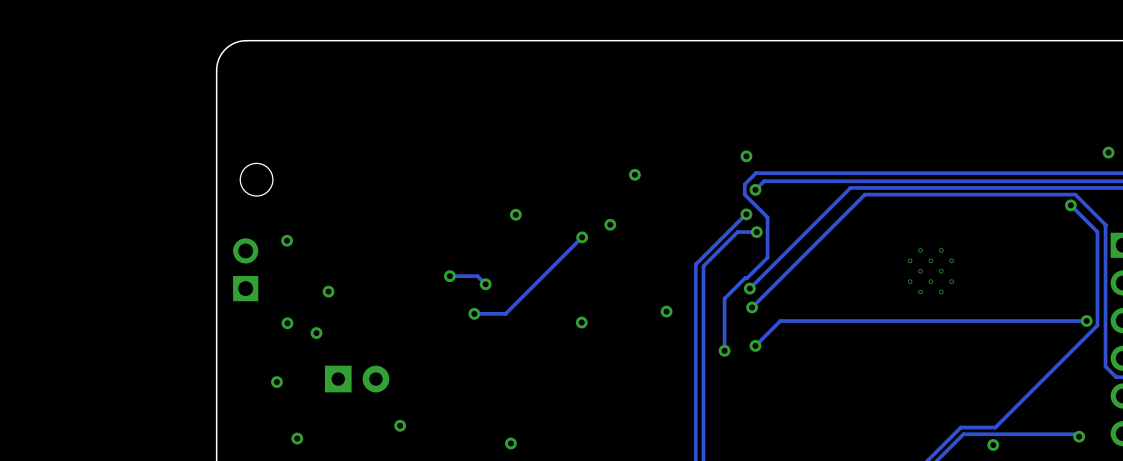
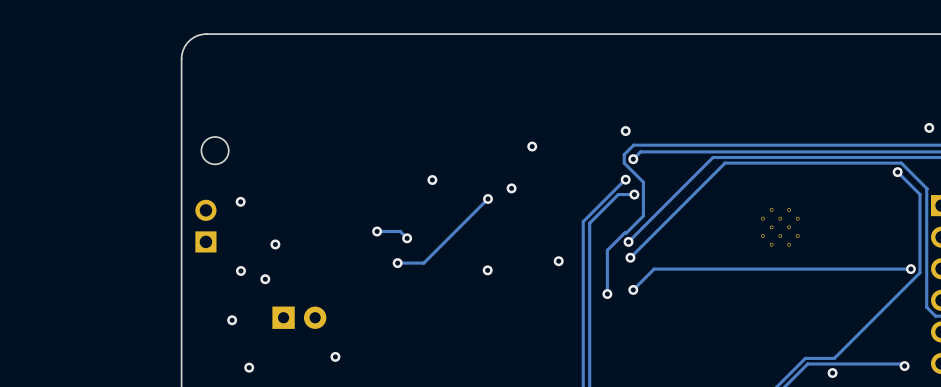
via: (510, 443) -> none

